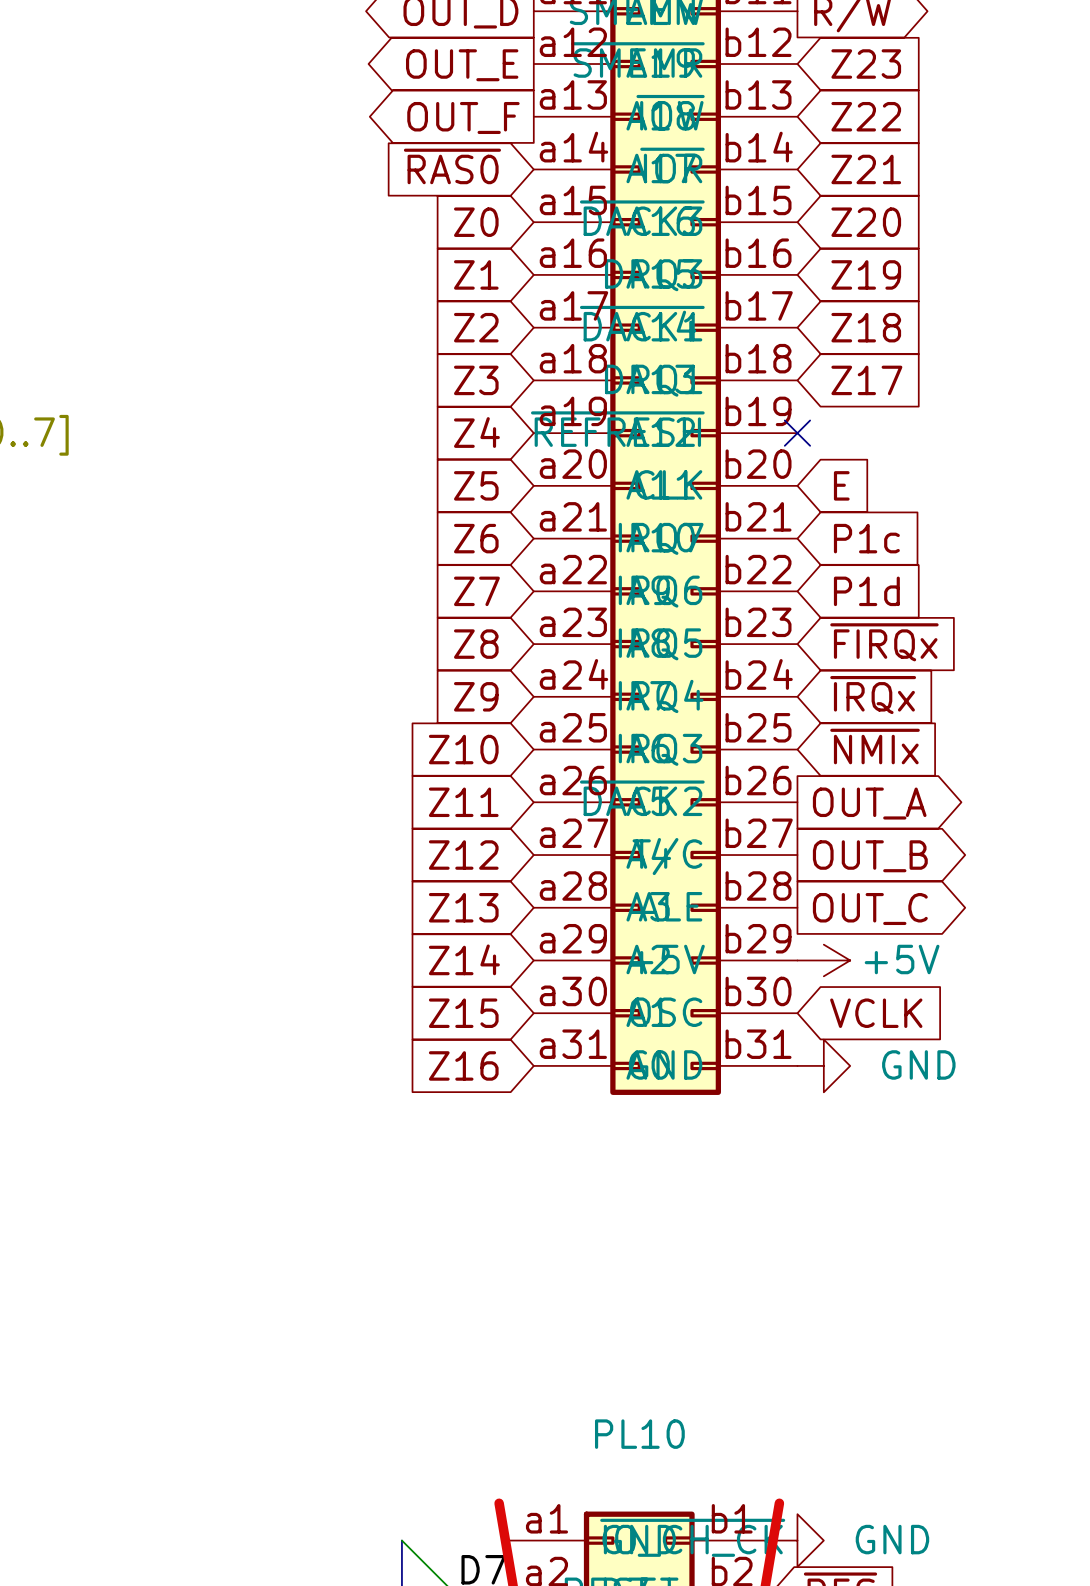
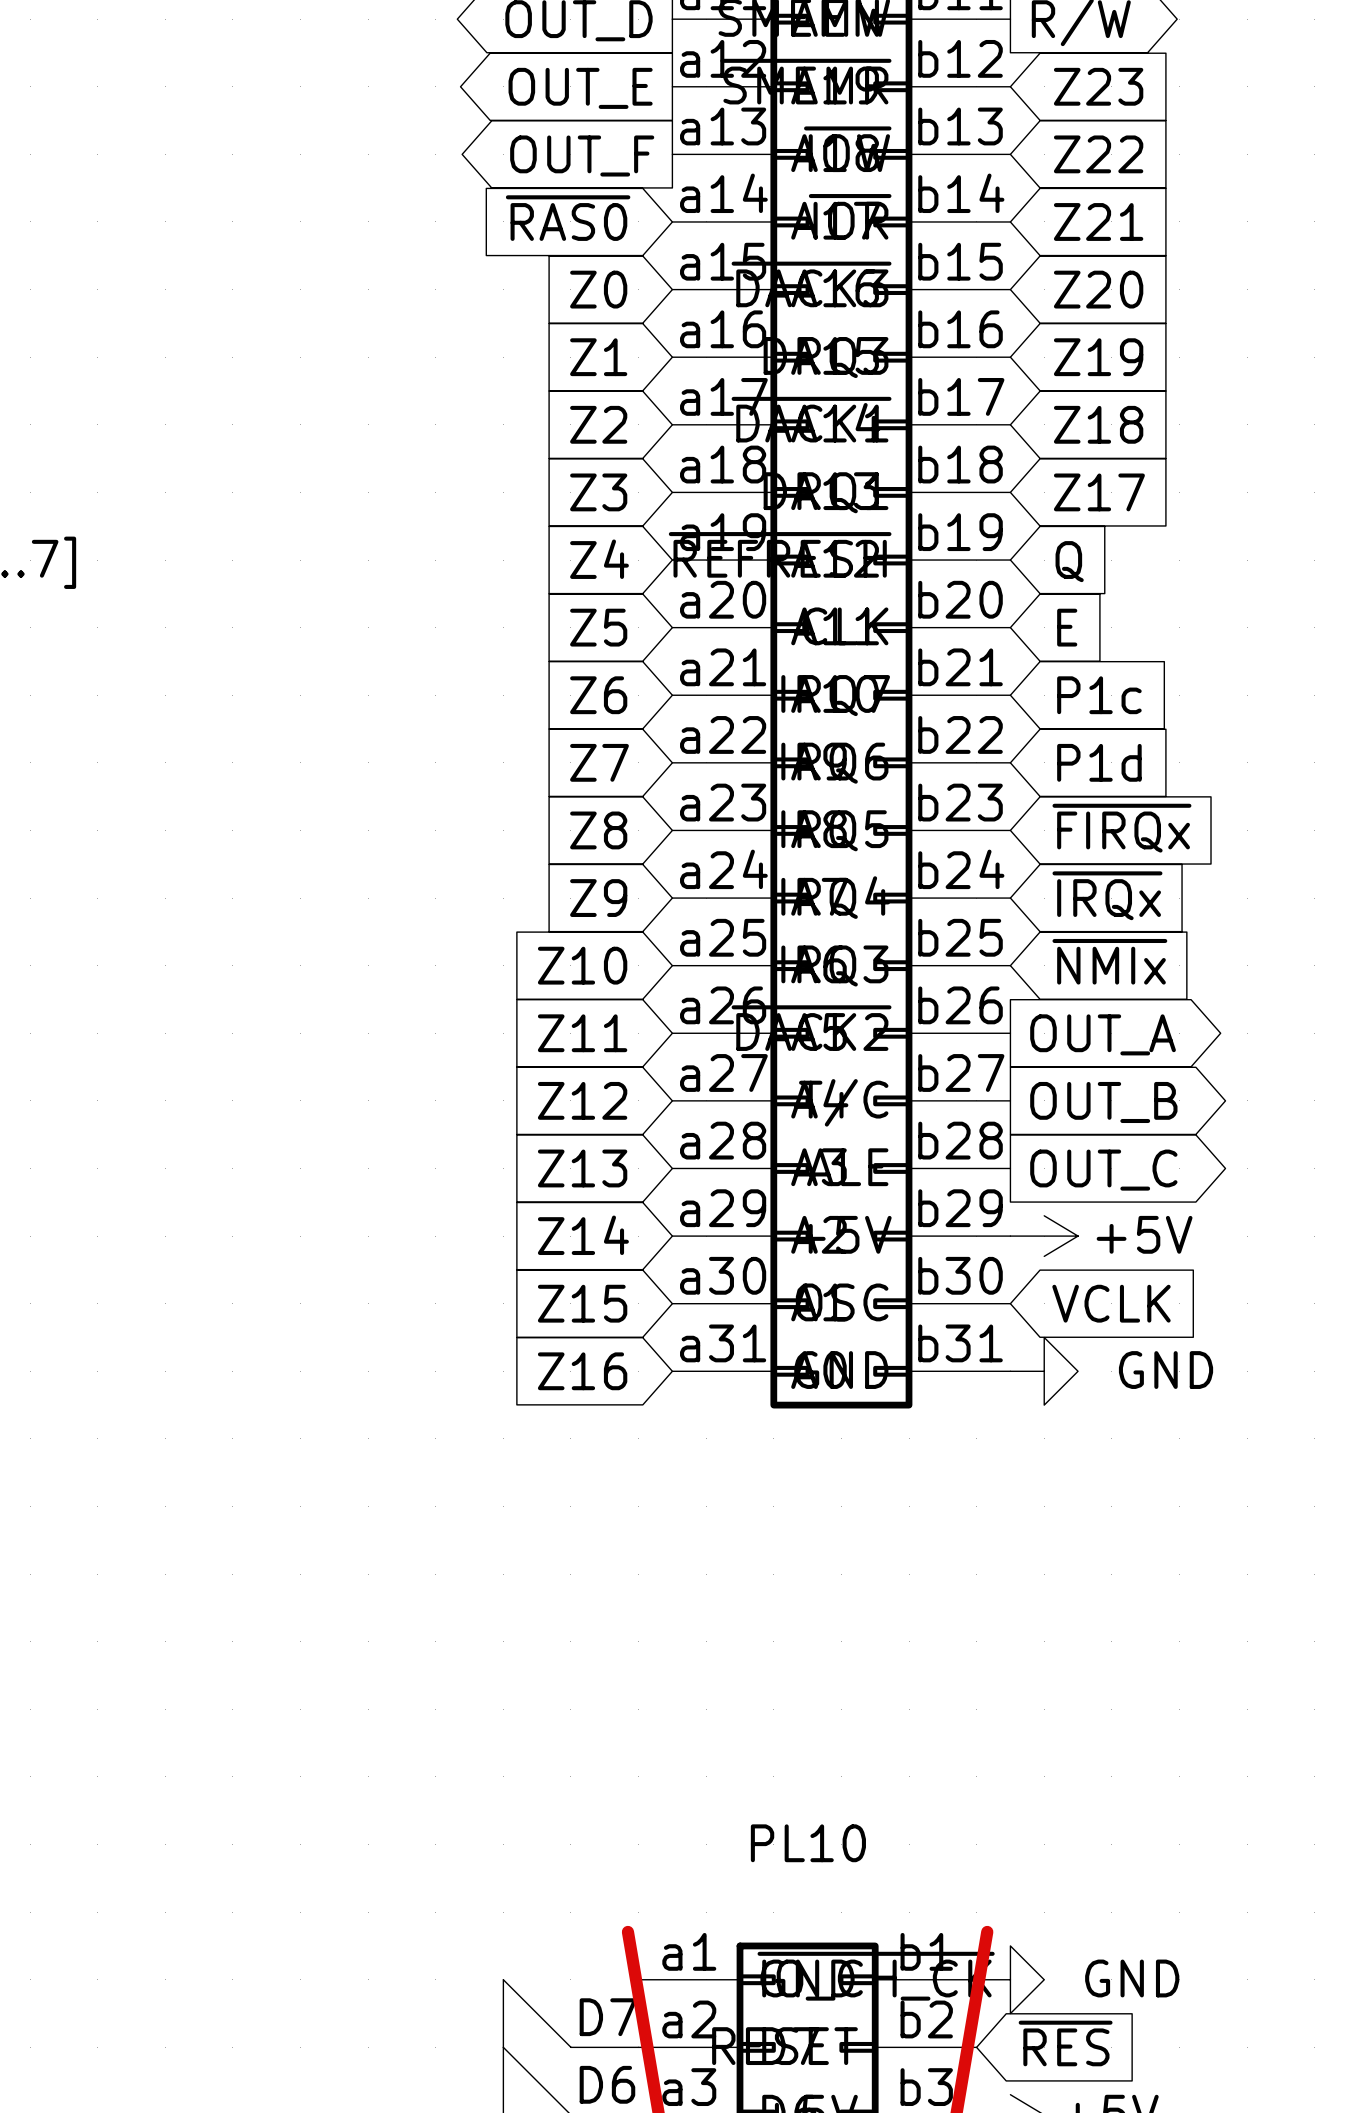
no-connect mark: (797, 433) -> none
global label: none -> Q (1069, 561)

